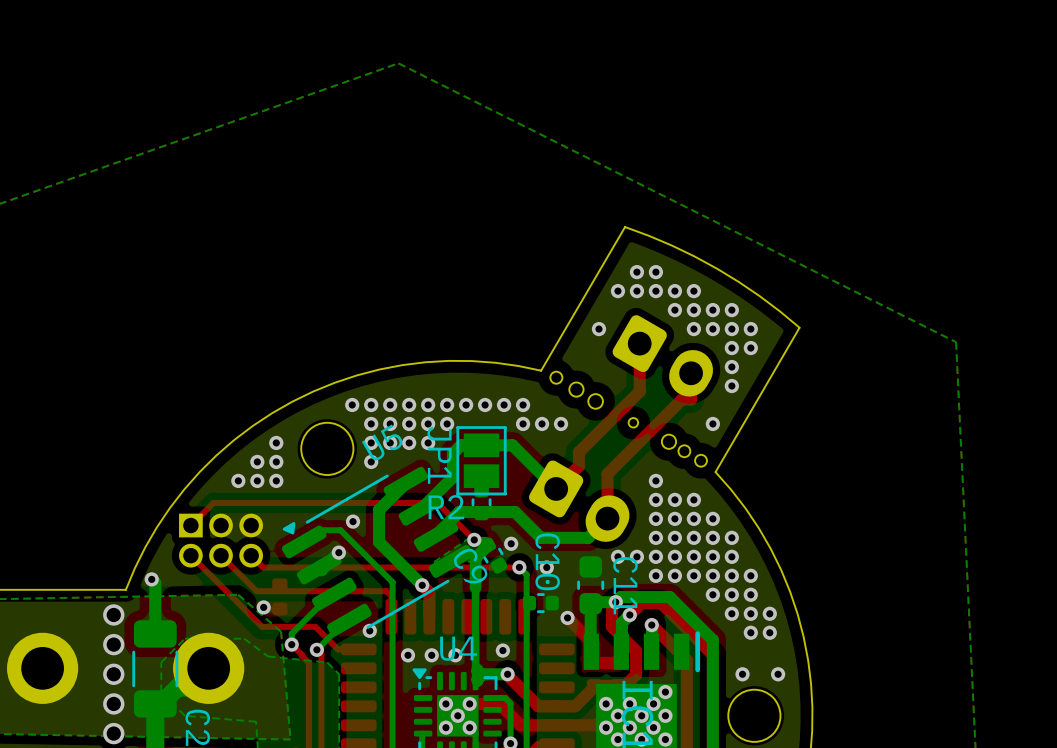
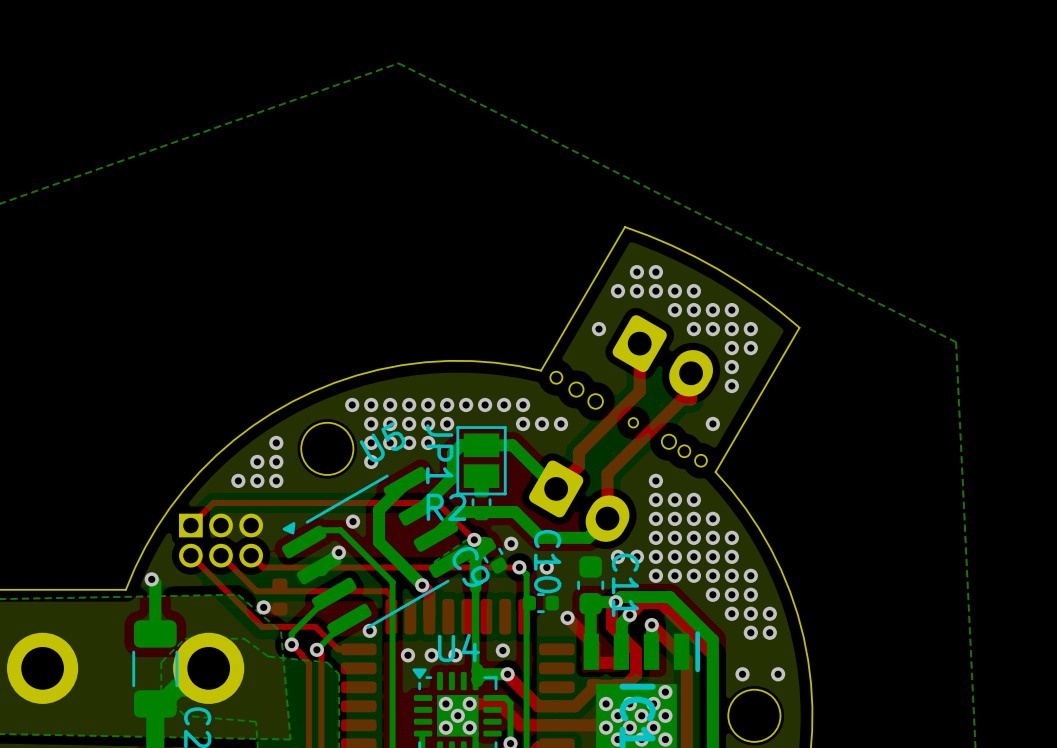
via: (113, 614) -> none
via: (113, 644) -> none
via: (113, 674) -> none
via: (113, 703) -> none
via: (113, 733) -> none

